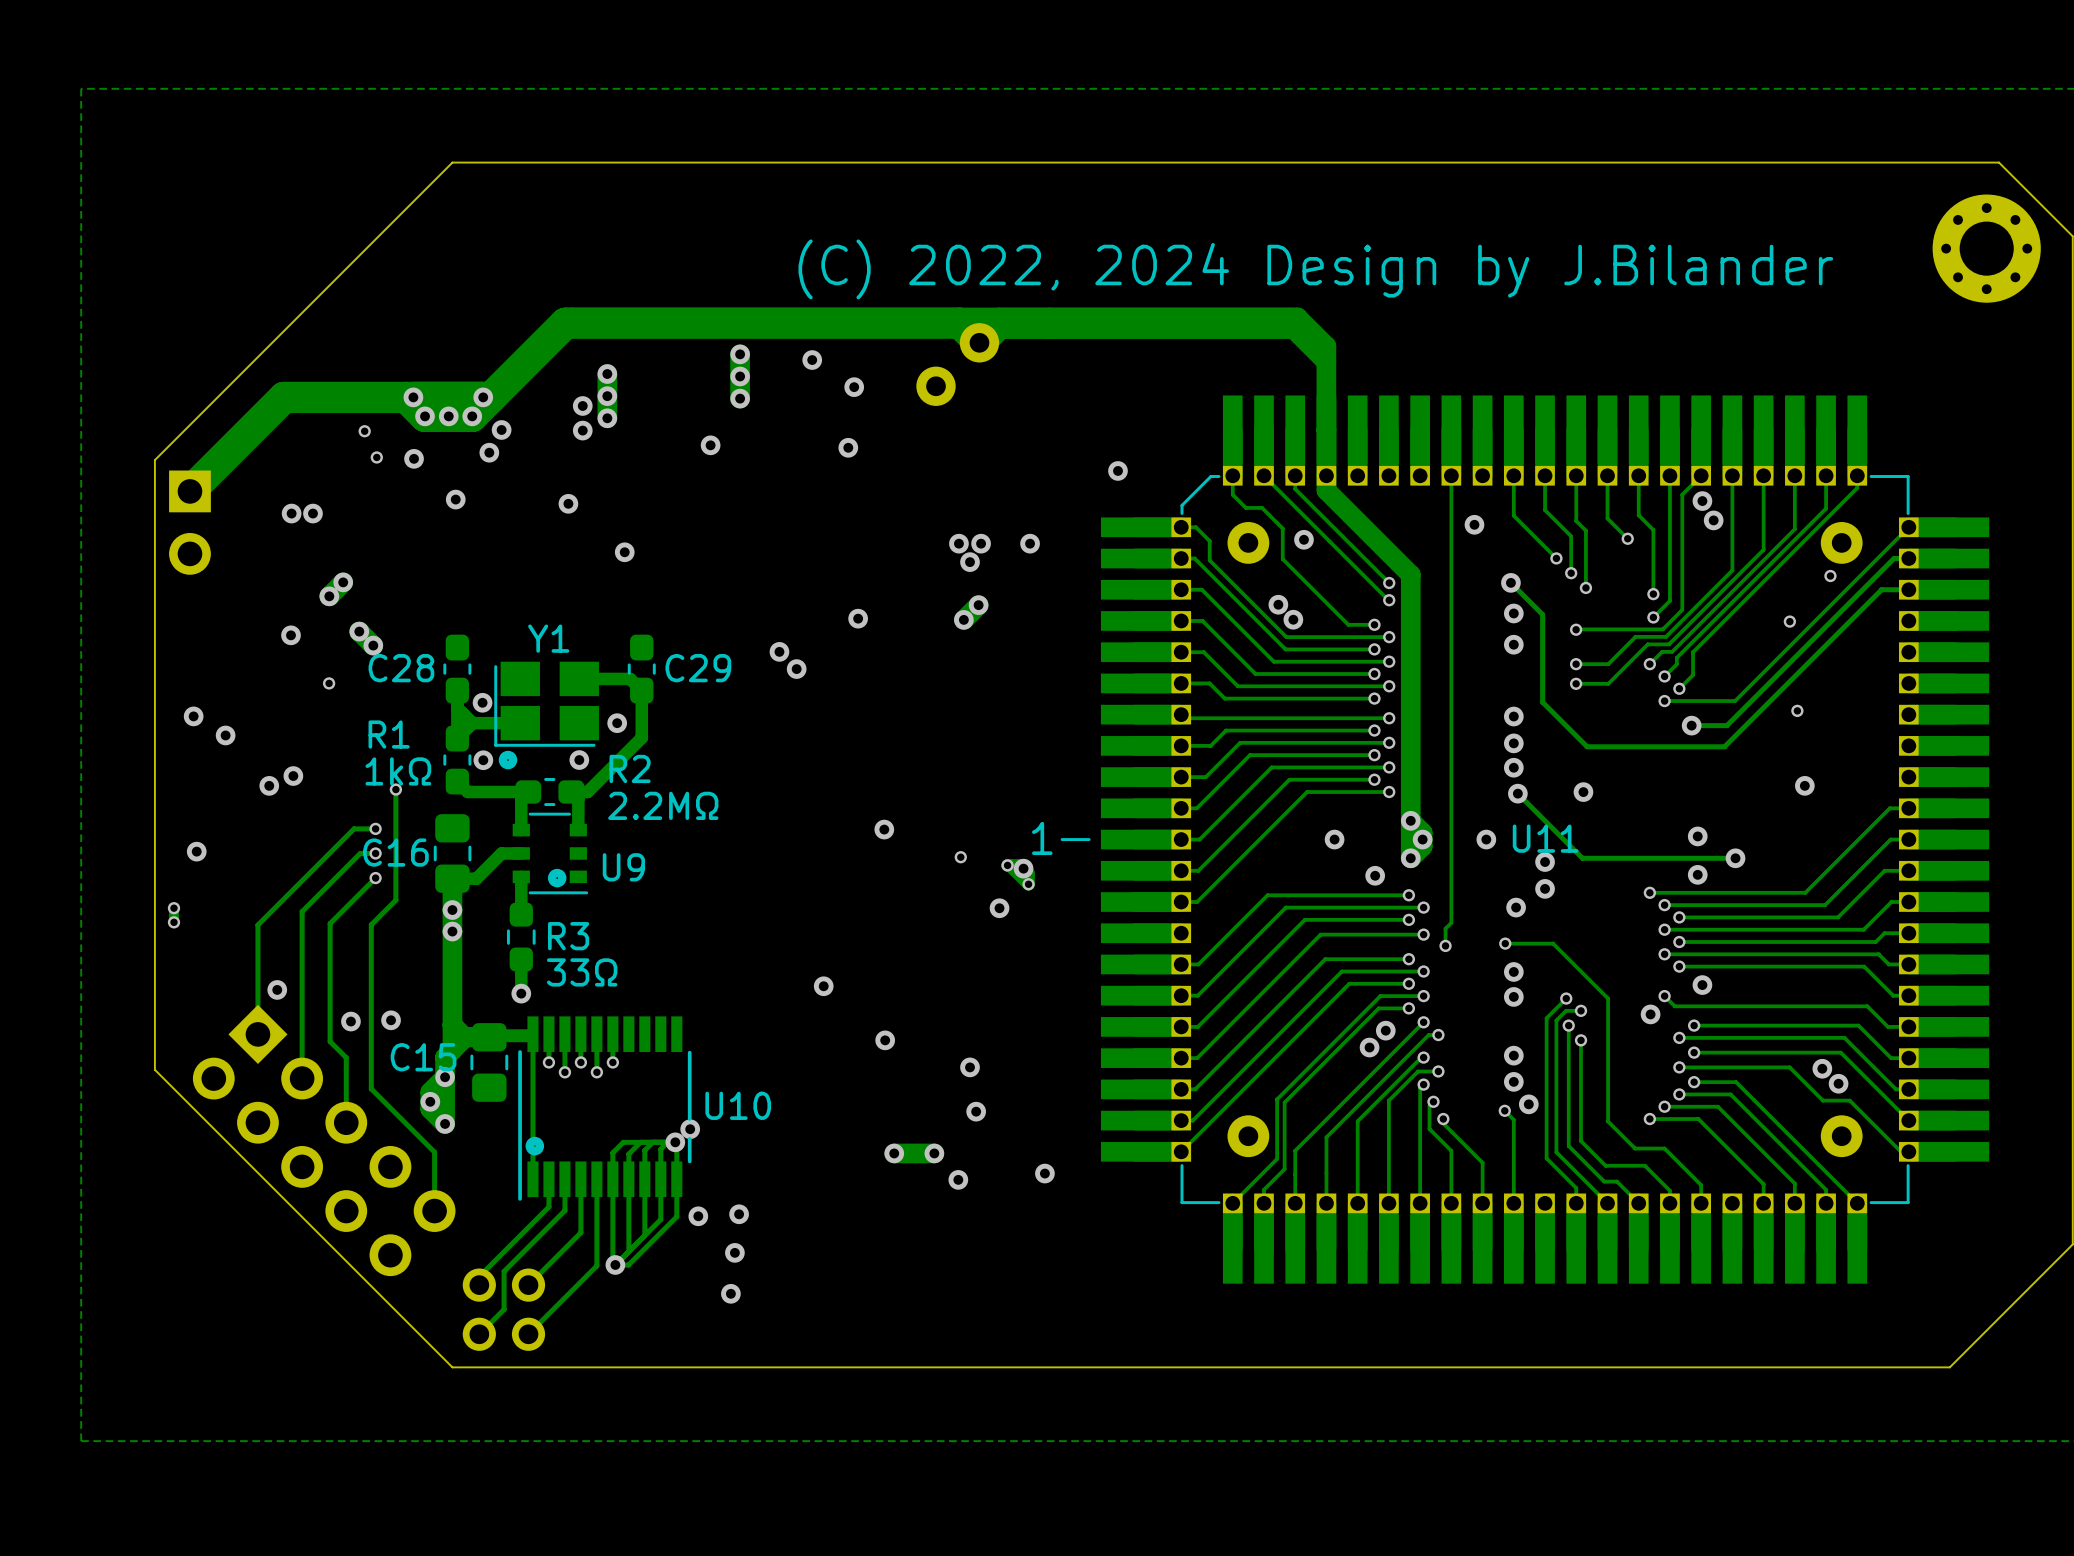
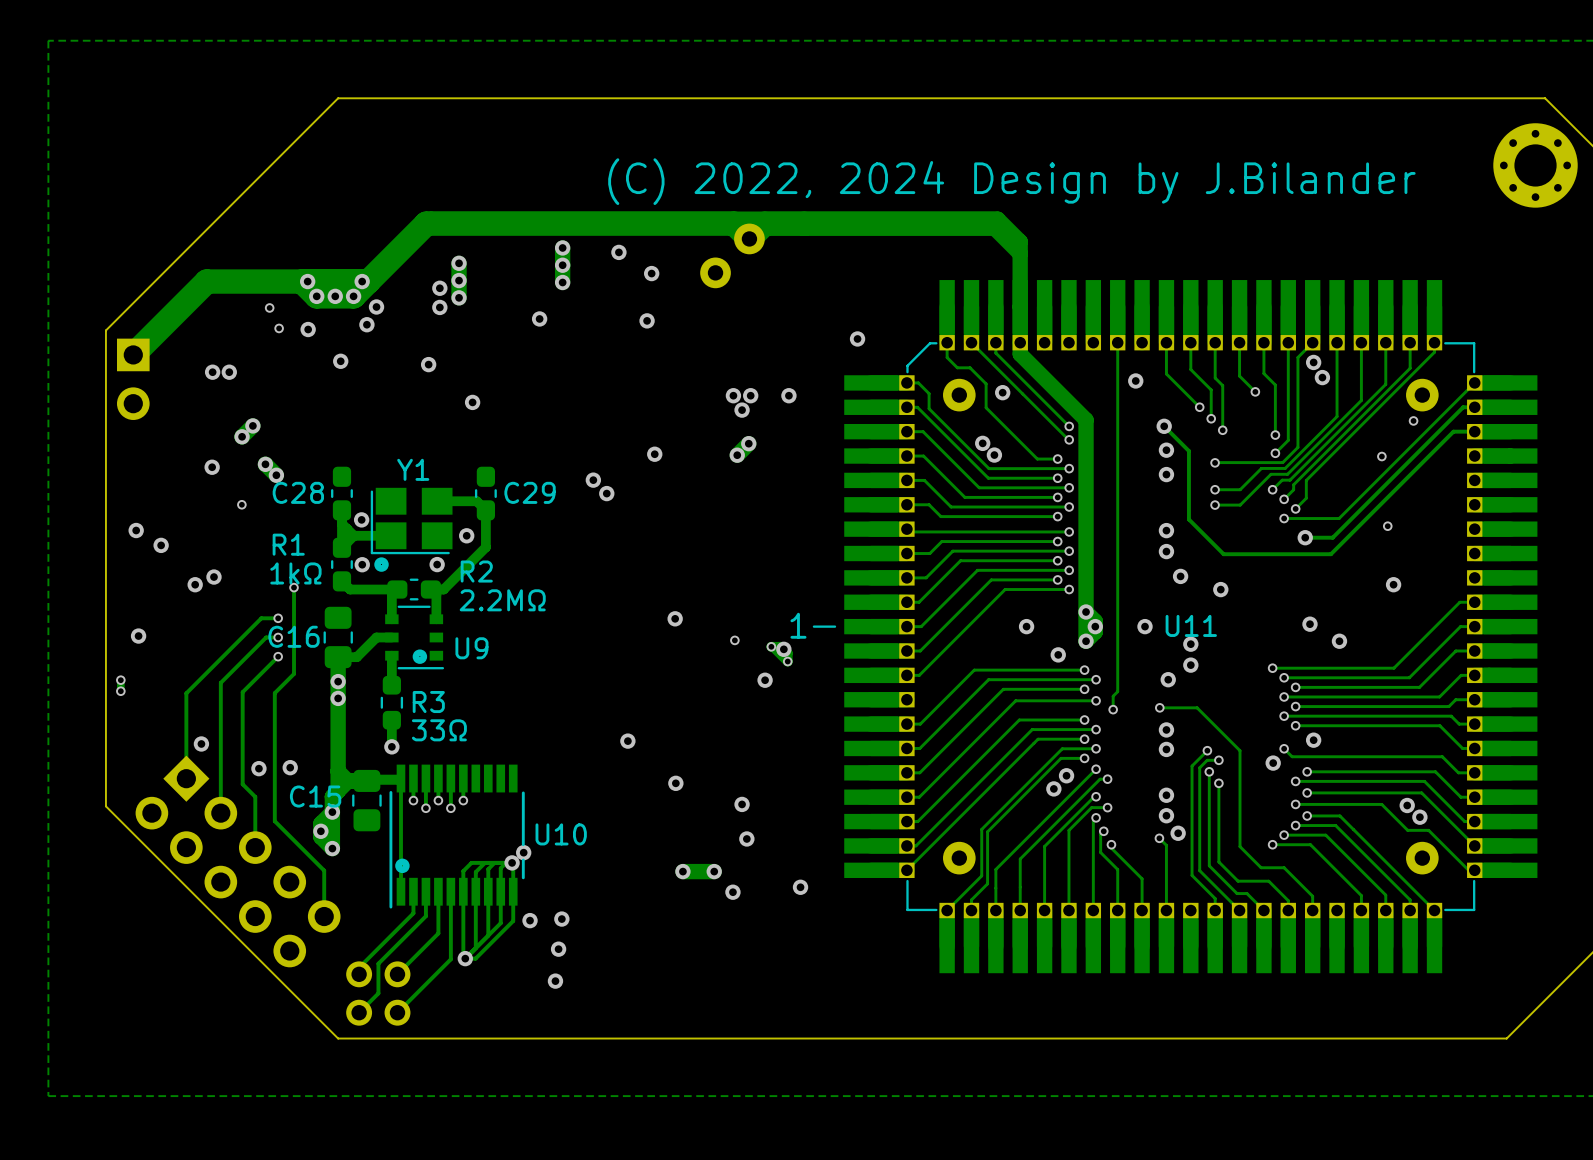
via: (1513, 767) -> none
via: none -> (1180, 576)
track: (1517, 793) (1582, 858) (1735, 858) -> none
via: (1517, 793) -> none
via: (1697, 874) -> none

